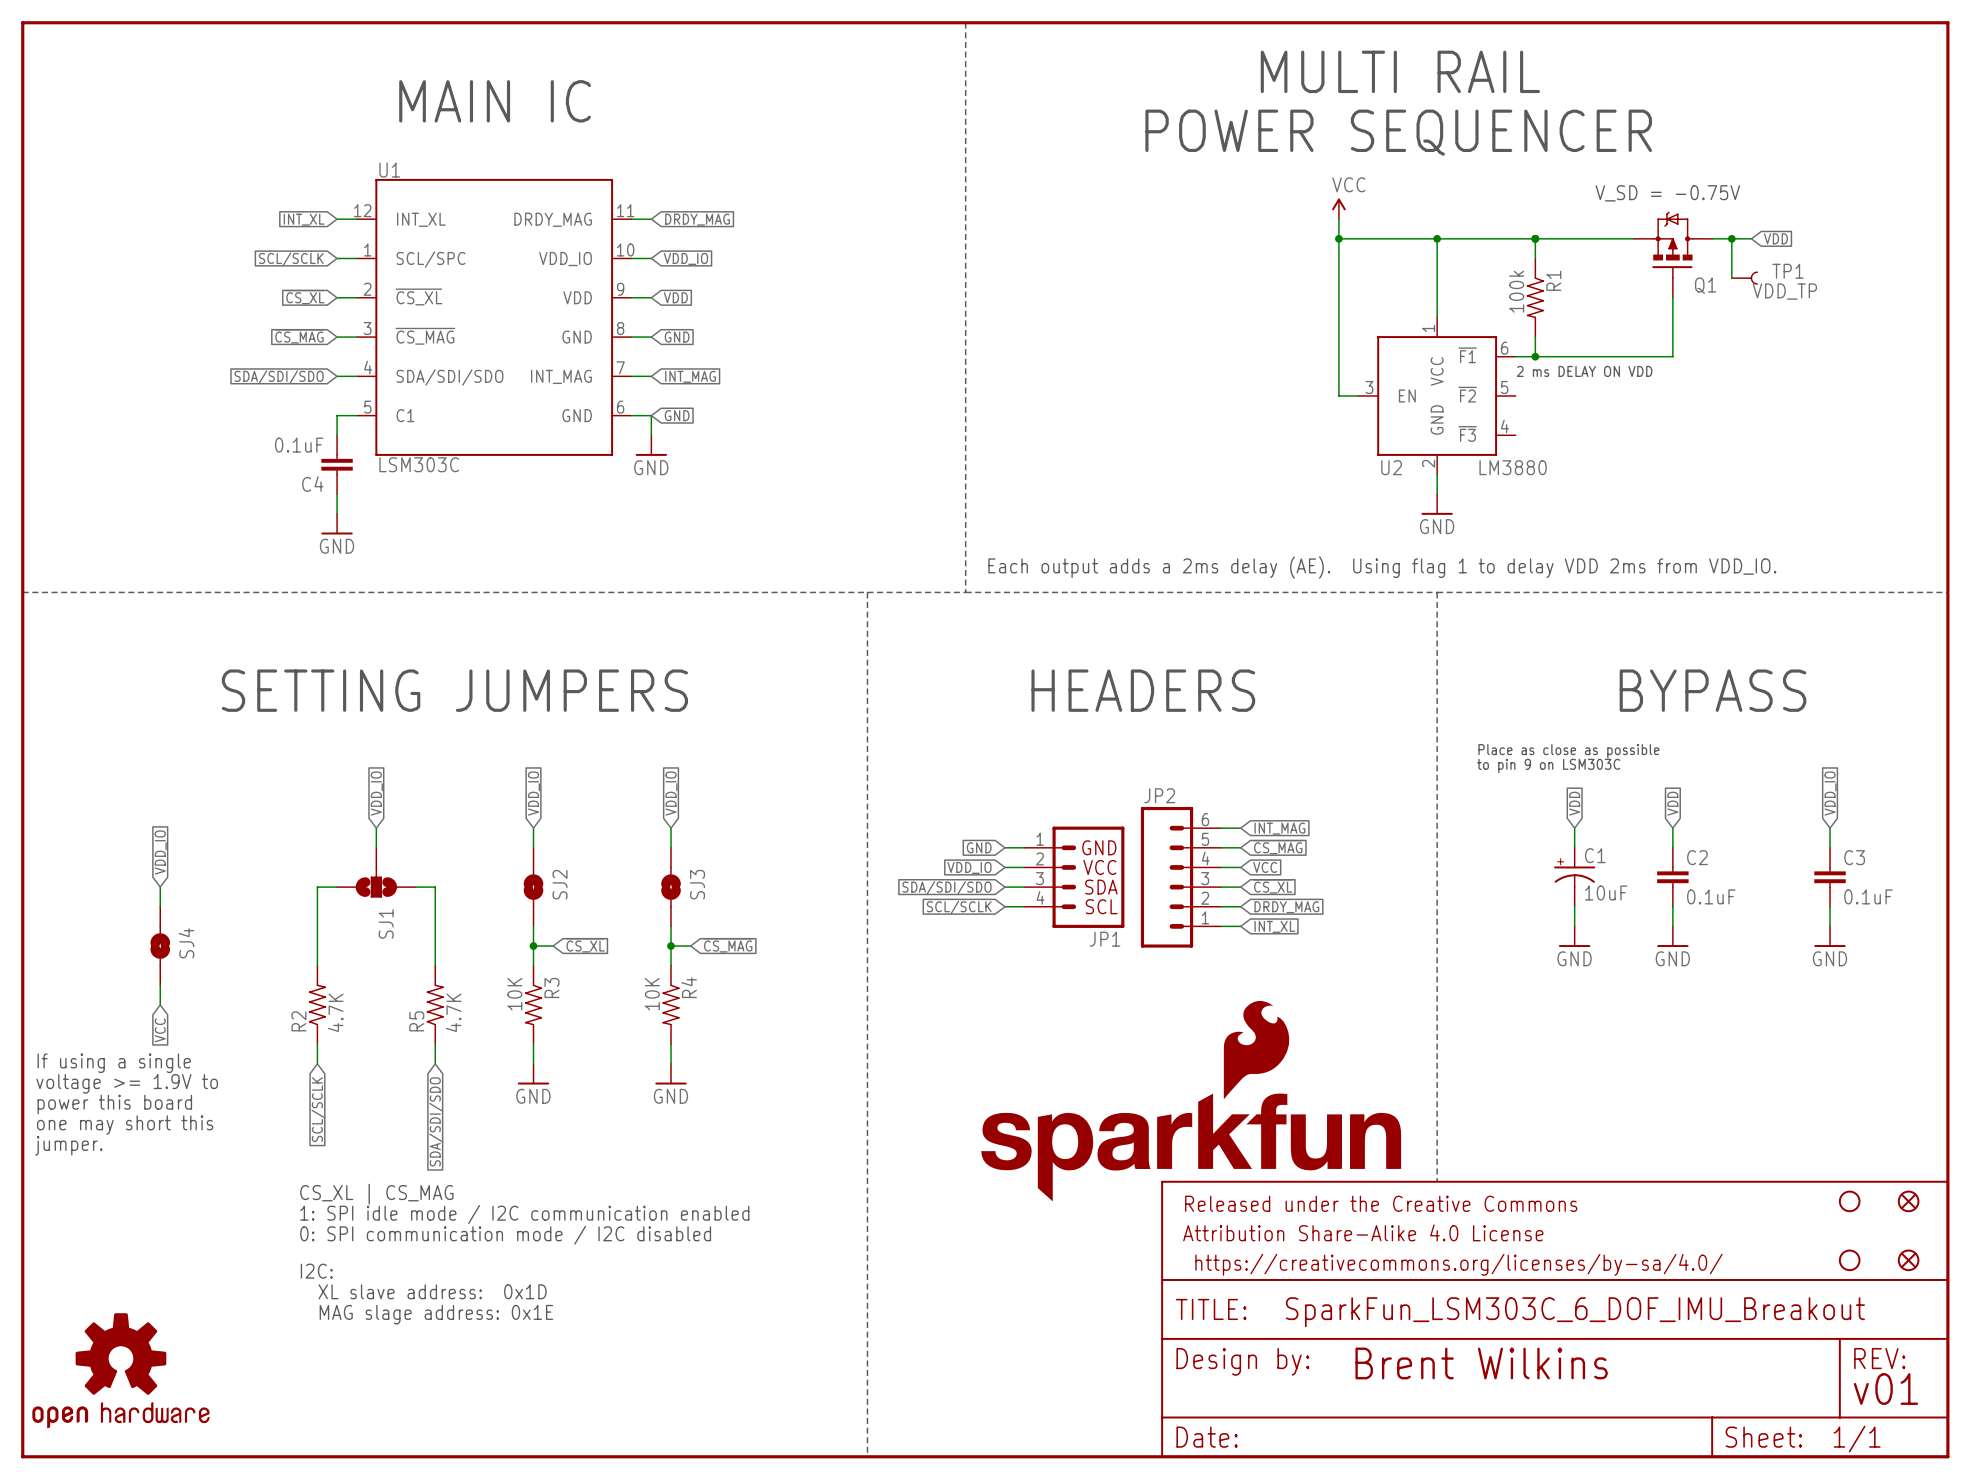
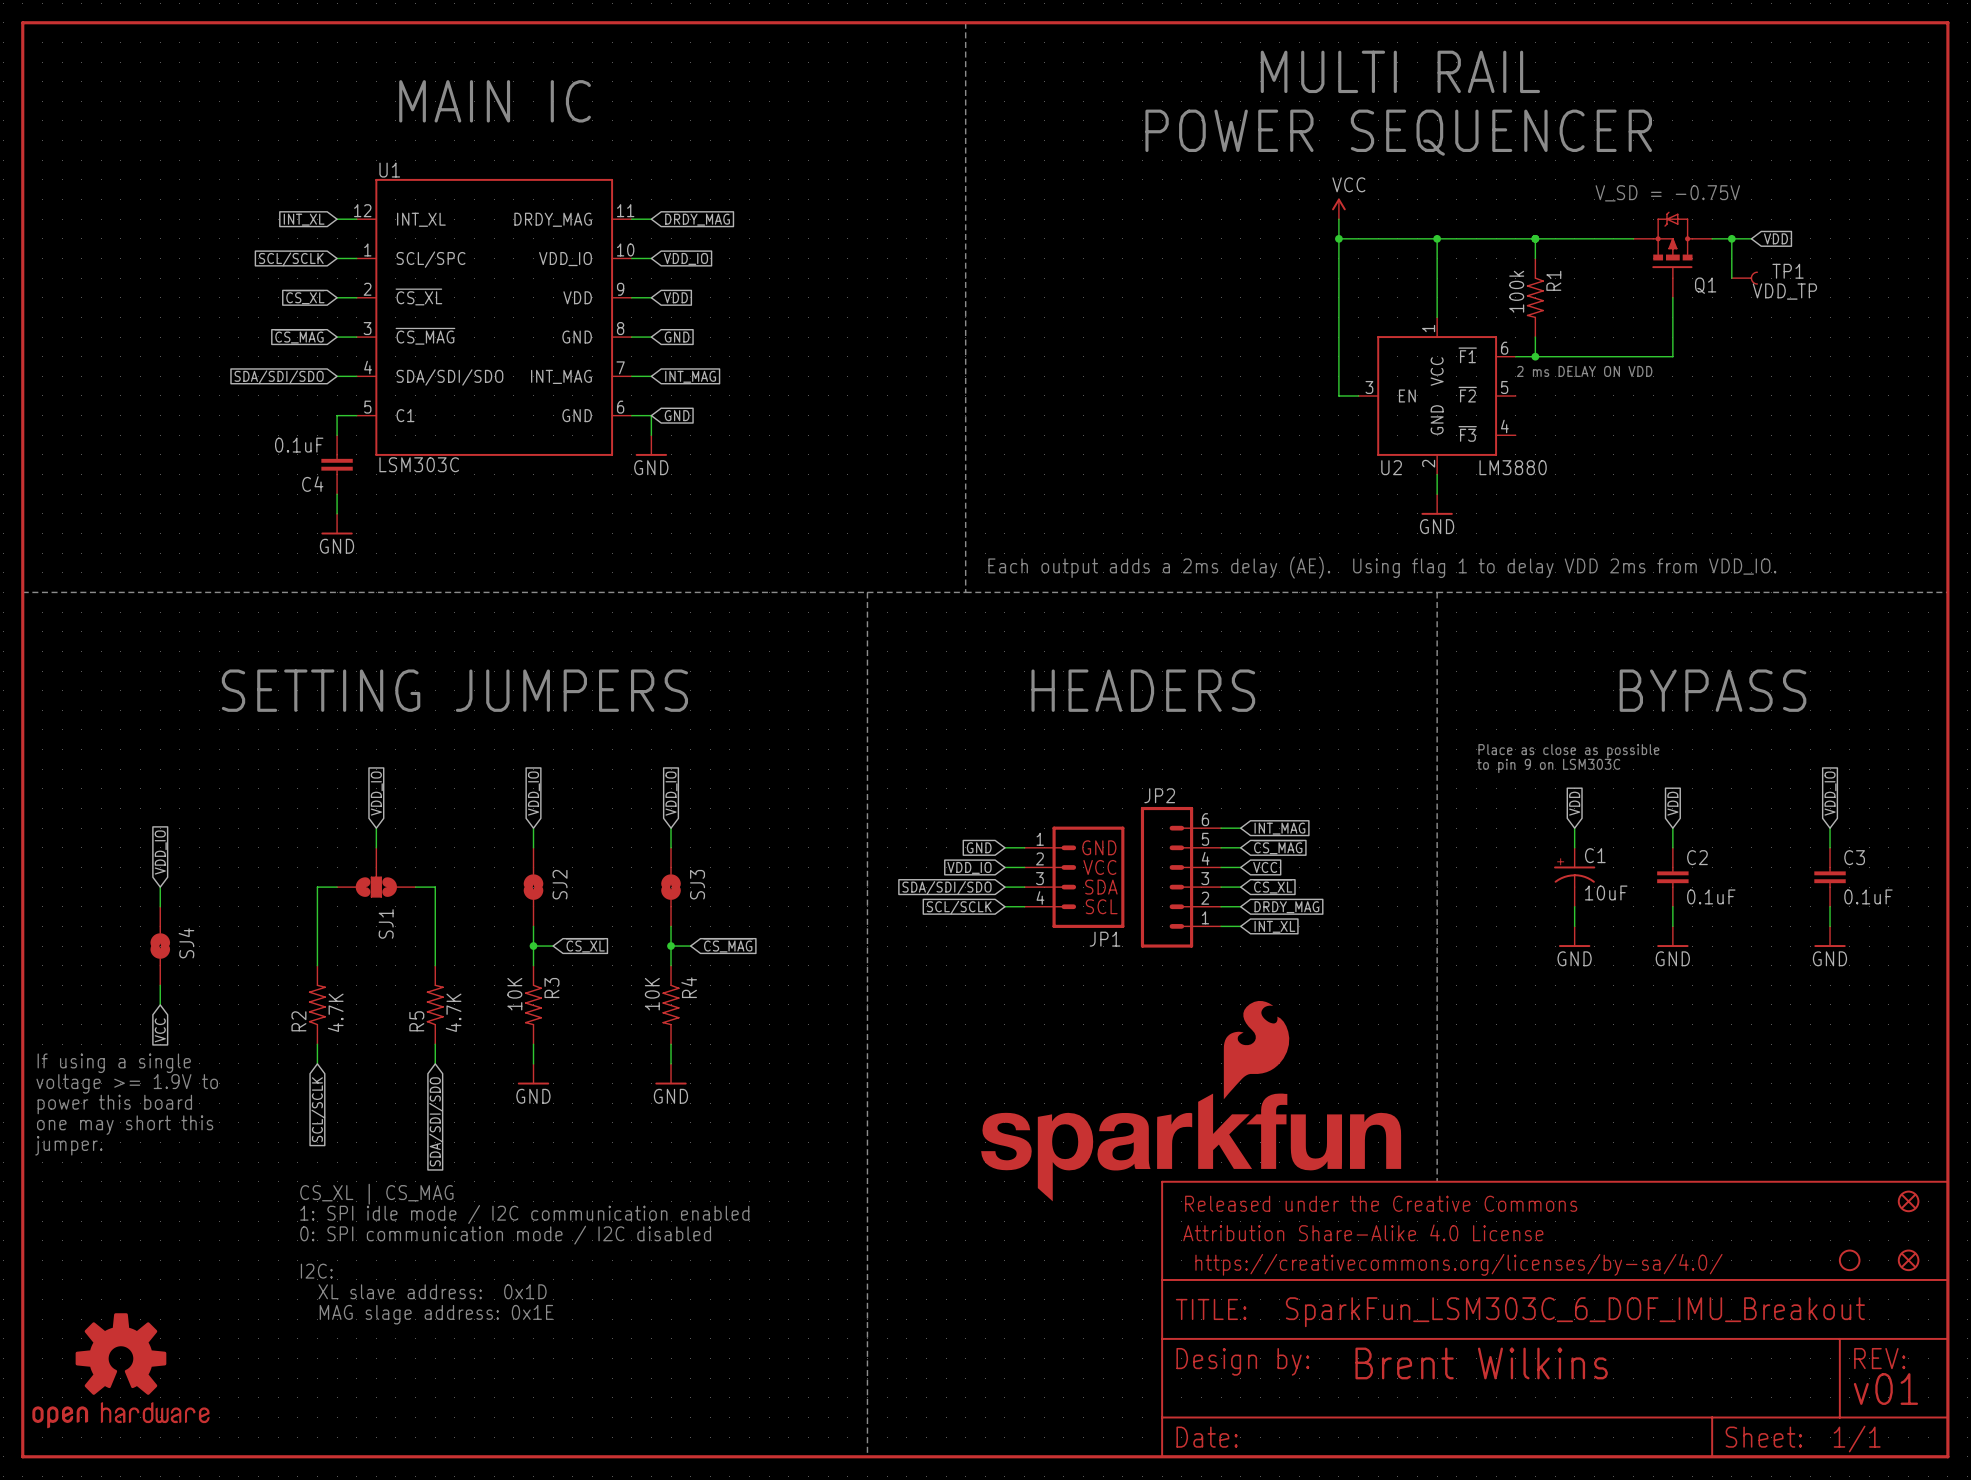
part: (1849, 1201) -> none

